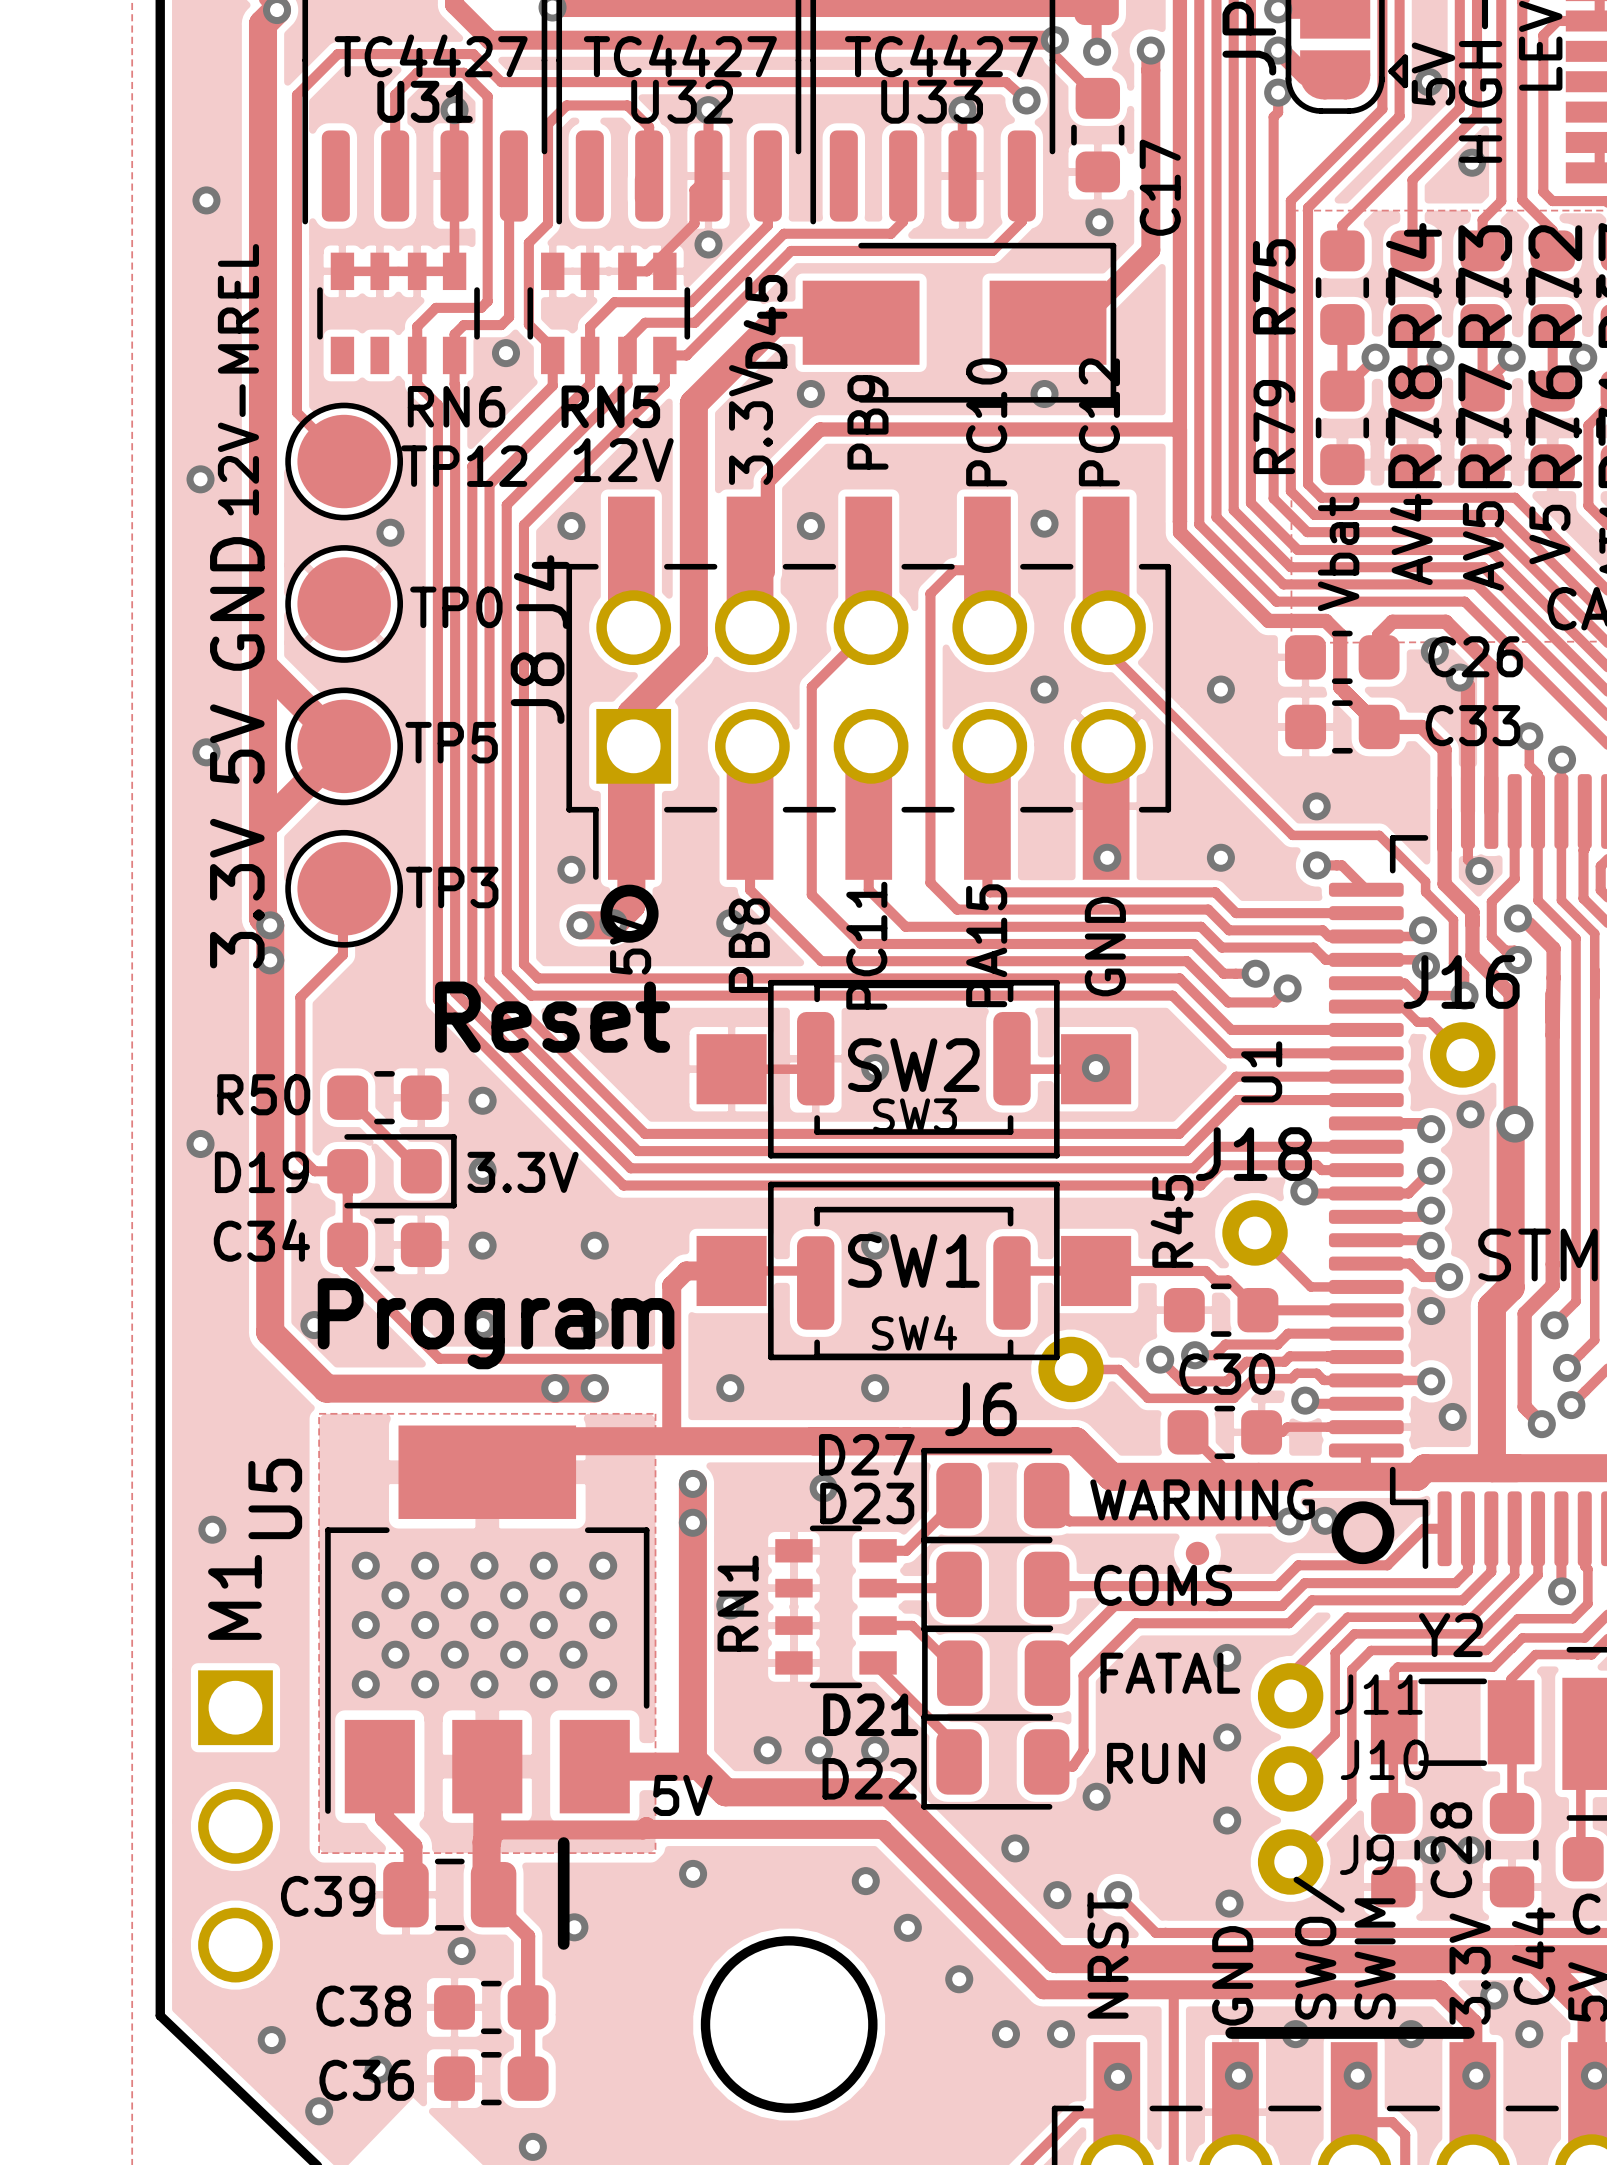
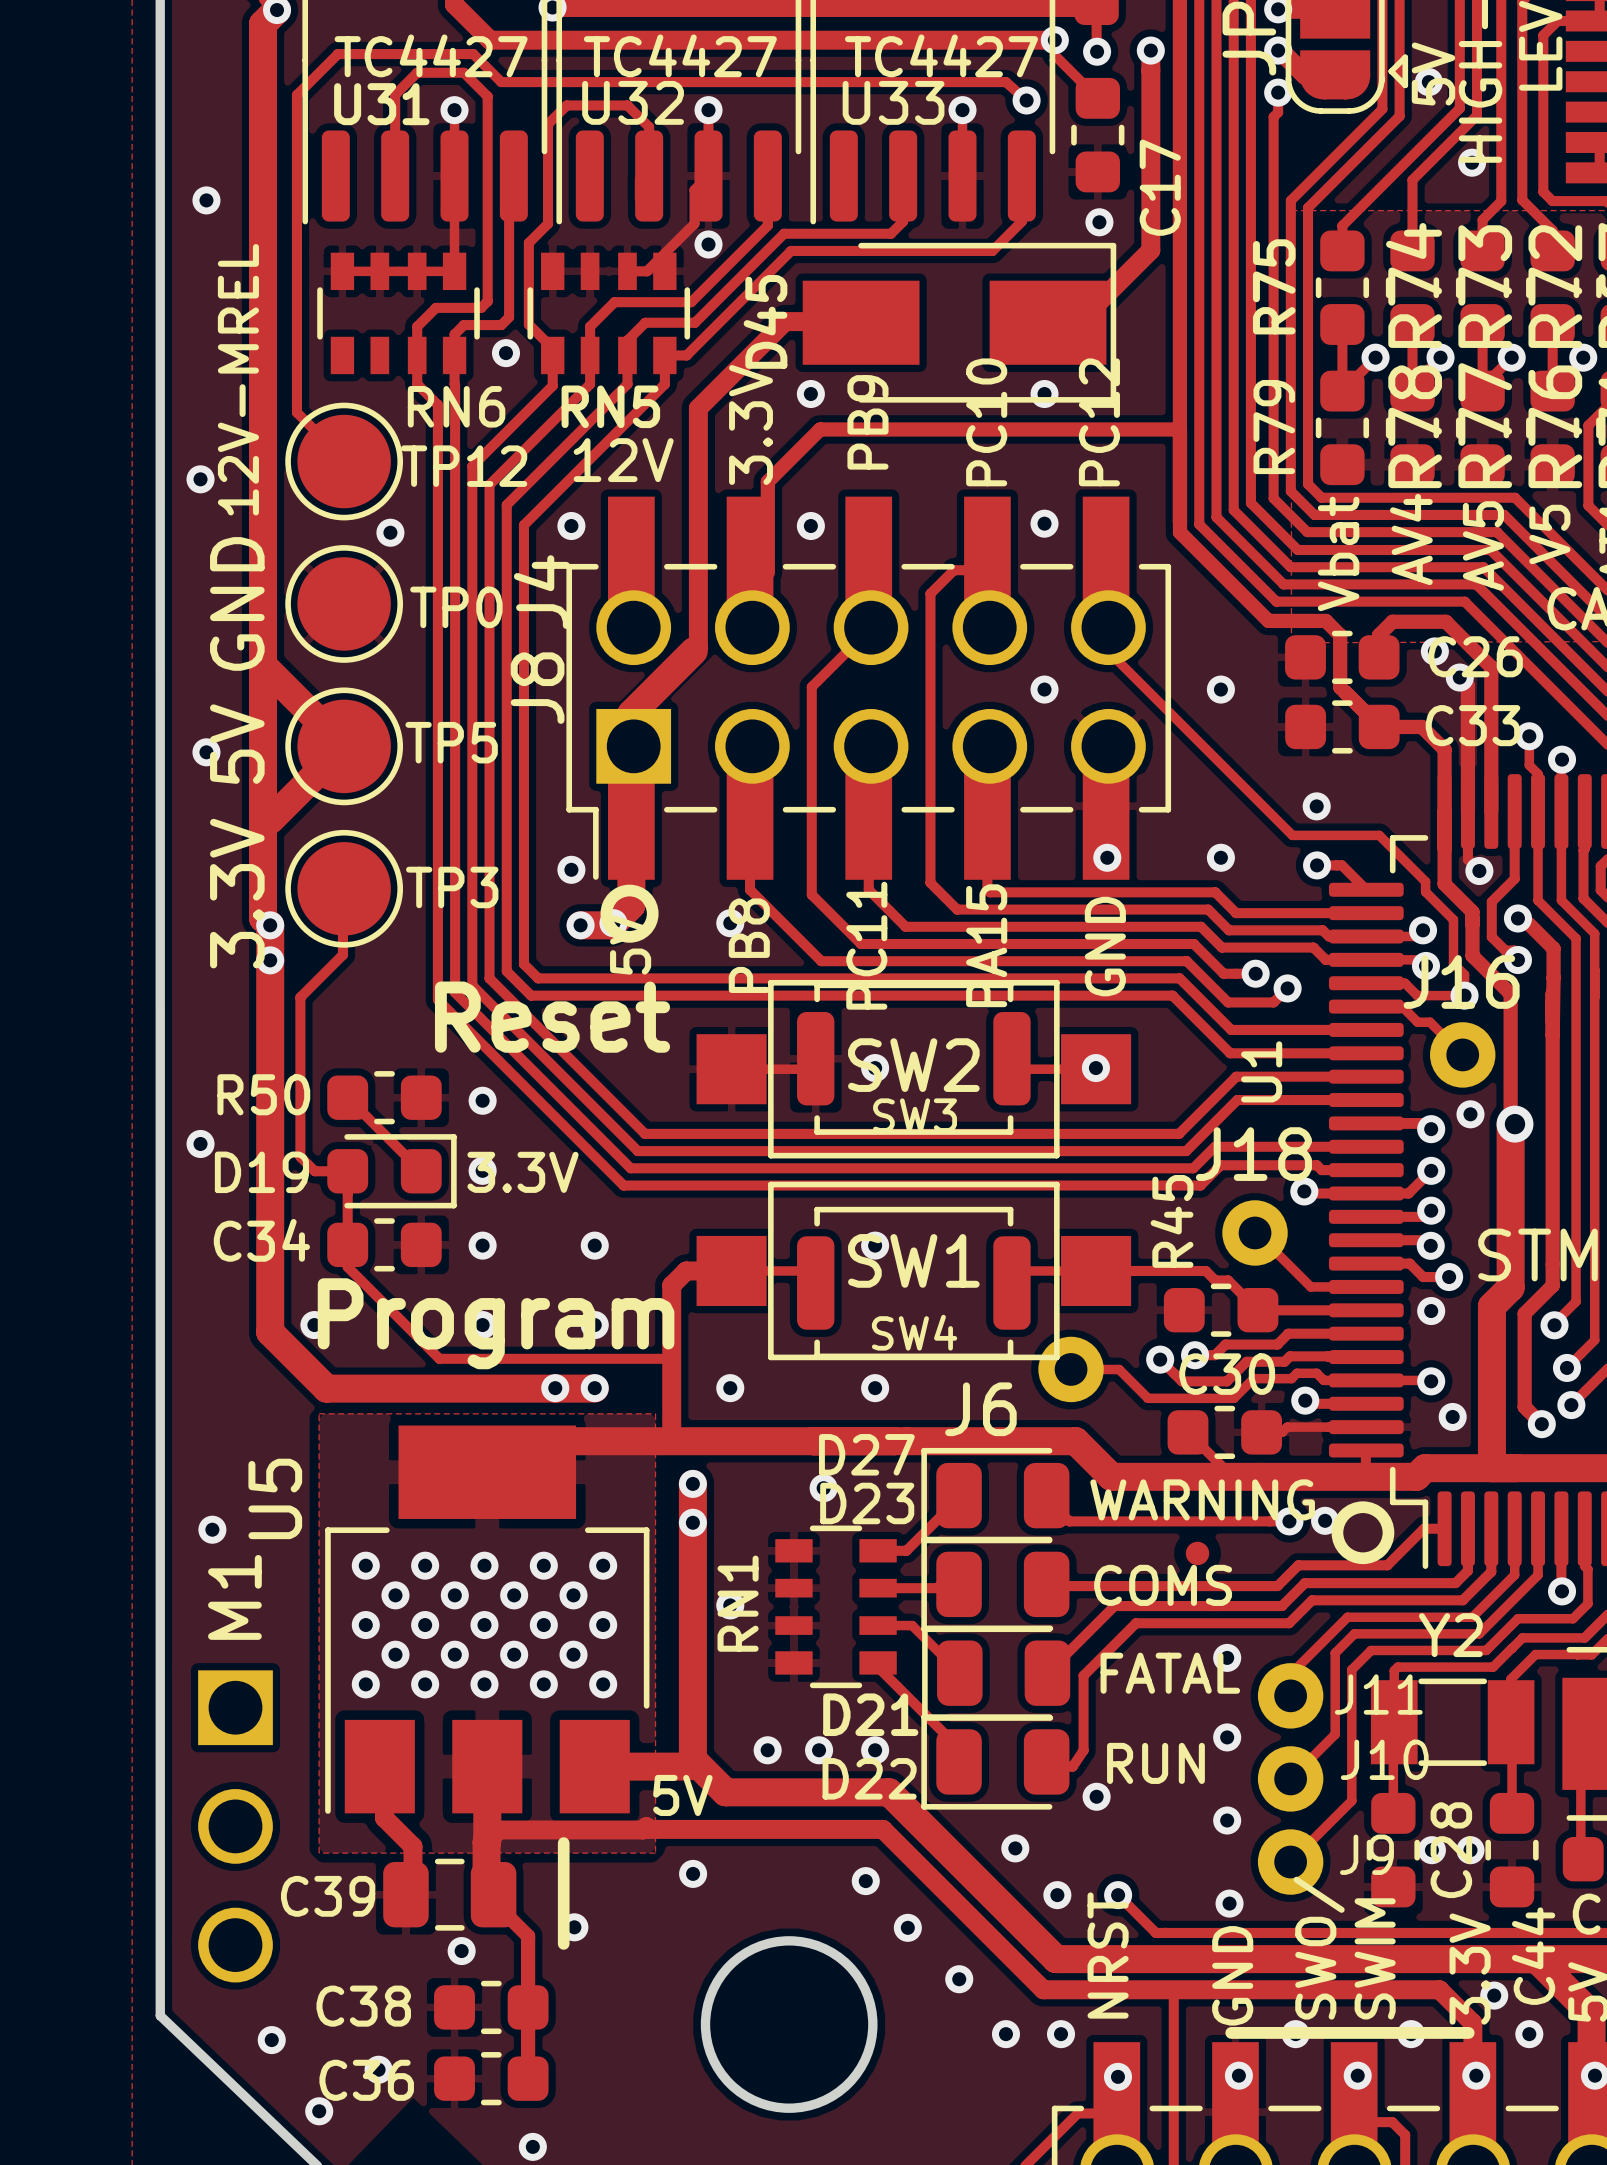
U31 name position: U31 (425, 101) -> U31 (381, 104)
U32 name position: U32 (682, 101) -> U32 (633, 102)
U33 name position: U33 (932, 101) -> U33 (893, 102)
track: (861, 322) (774, 322) (693, 403) (693, 651) -> (873, 321) (785, 321) (698, 408) (698, 646) (693, 651)

